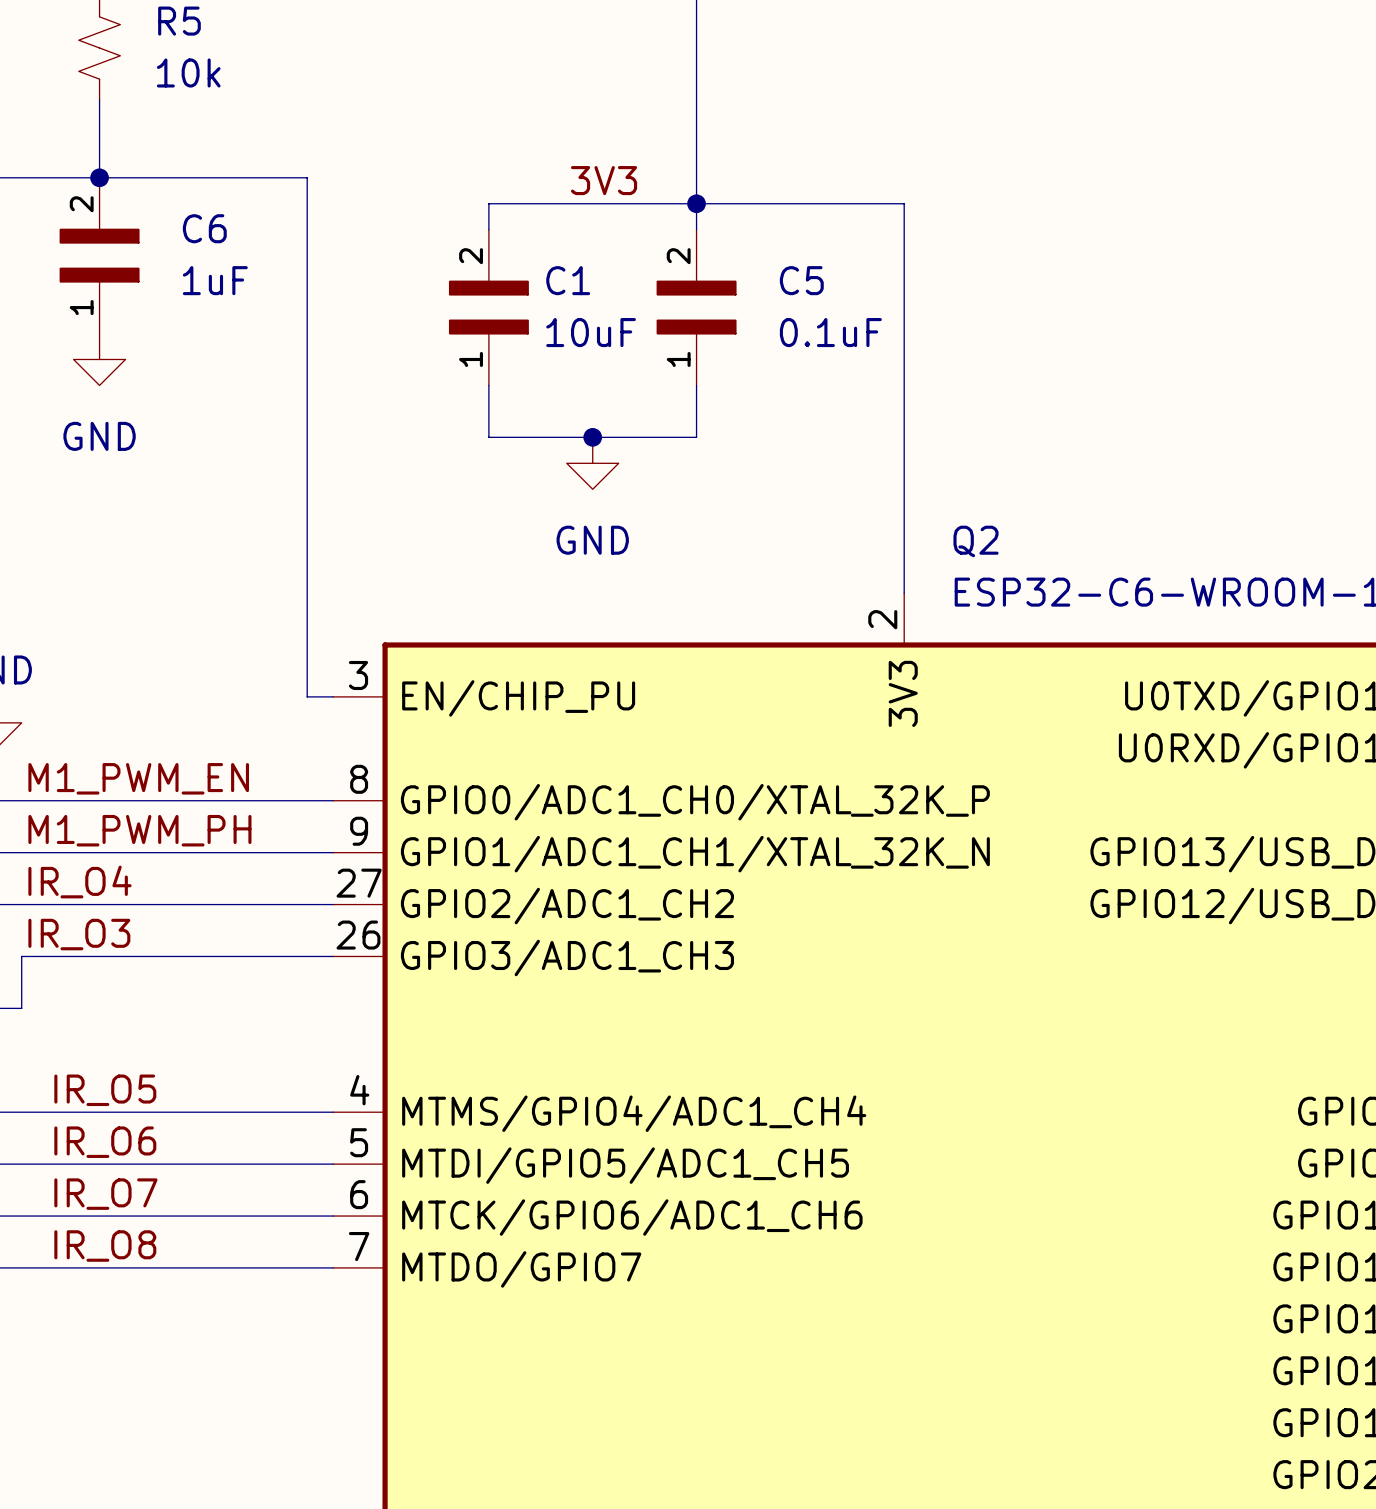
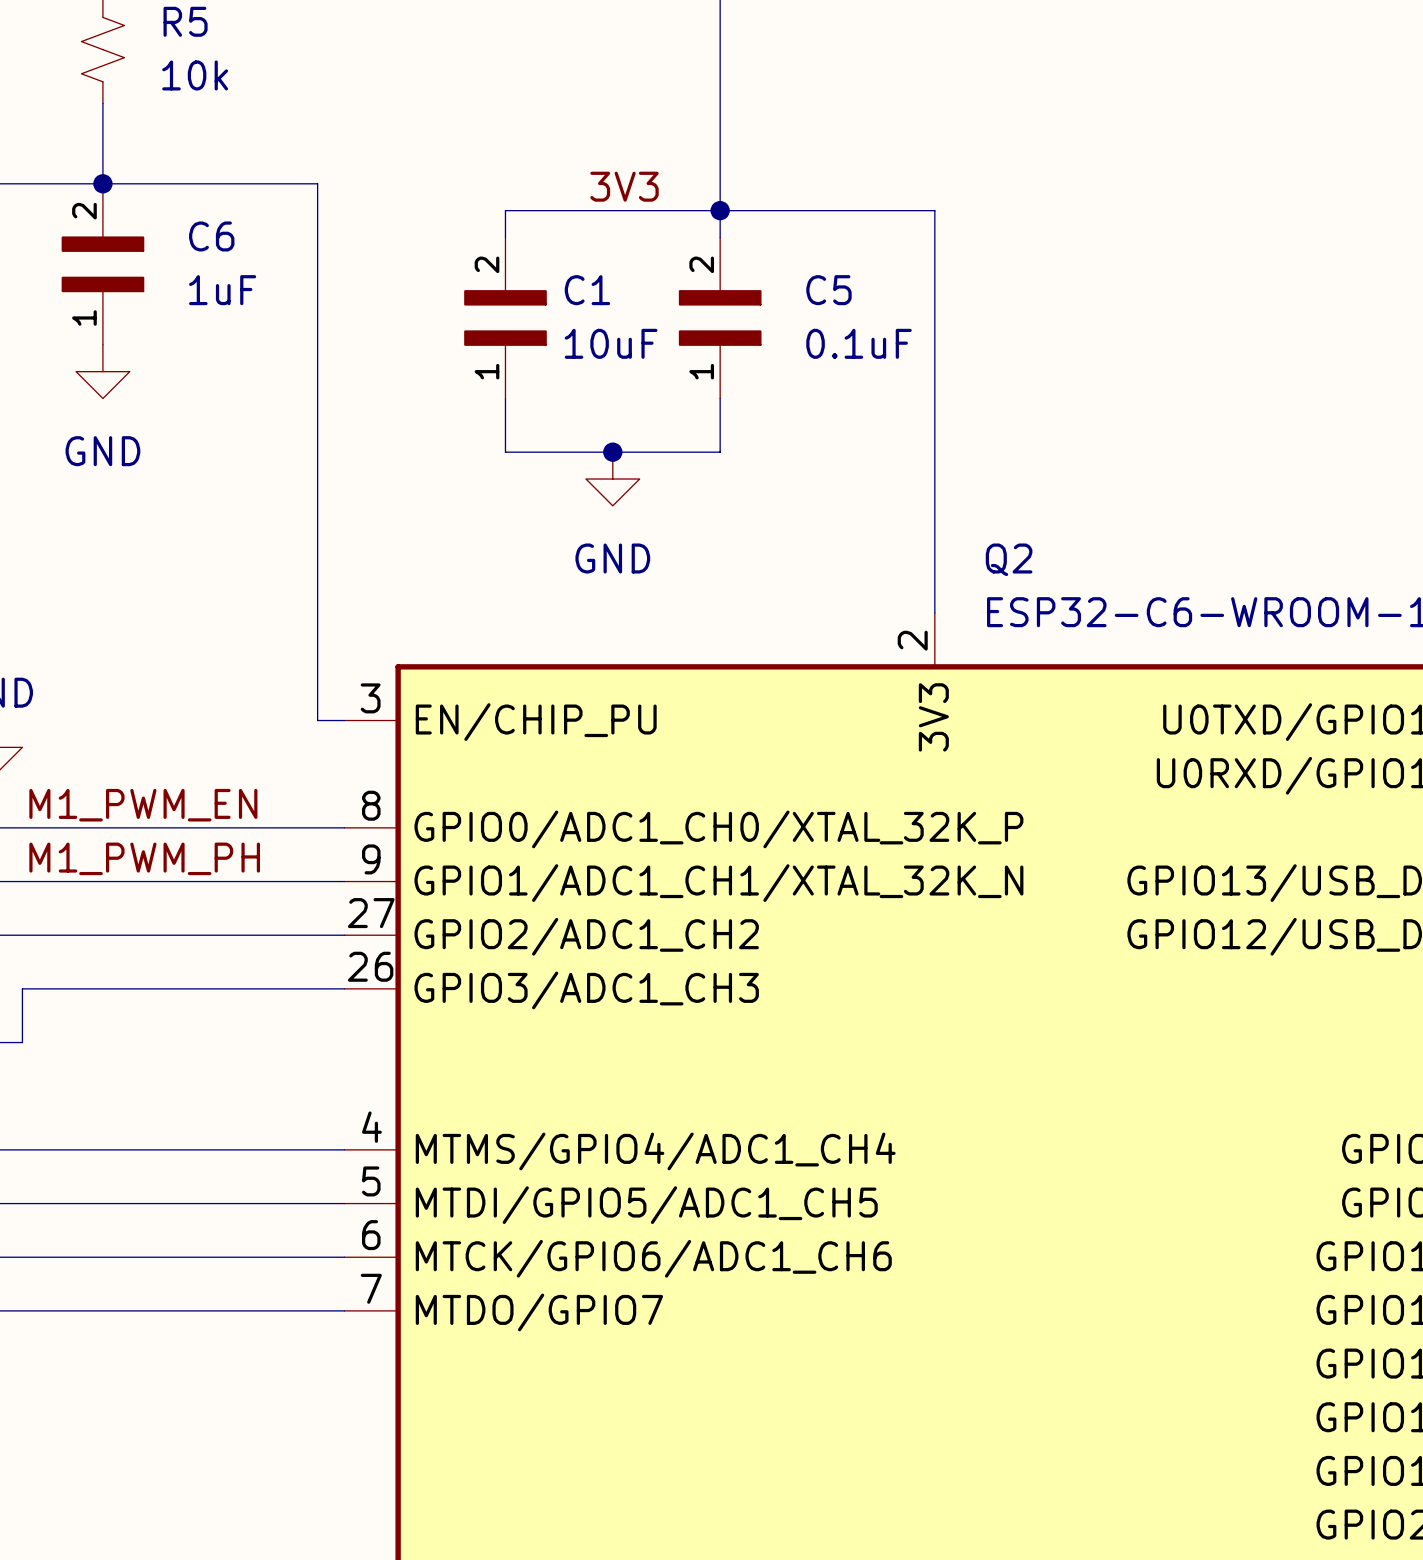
label: IR_O4 (79, 882) -> none
label: IR_O3 (79, 934) -> none
label: IR_O5 (105, 1090) -> none
label: IR_O6 (105, 1142) -> none
label: IR_O7 (105, 1194) -> none
label: IR_O8 (105, 1246) -> none

